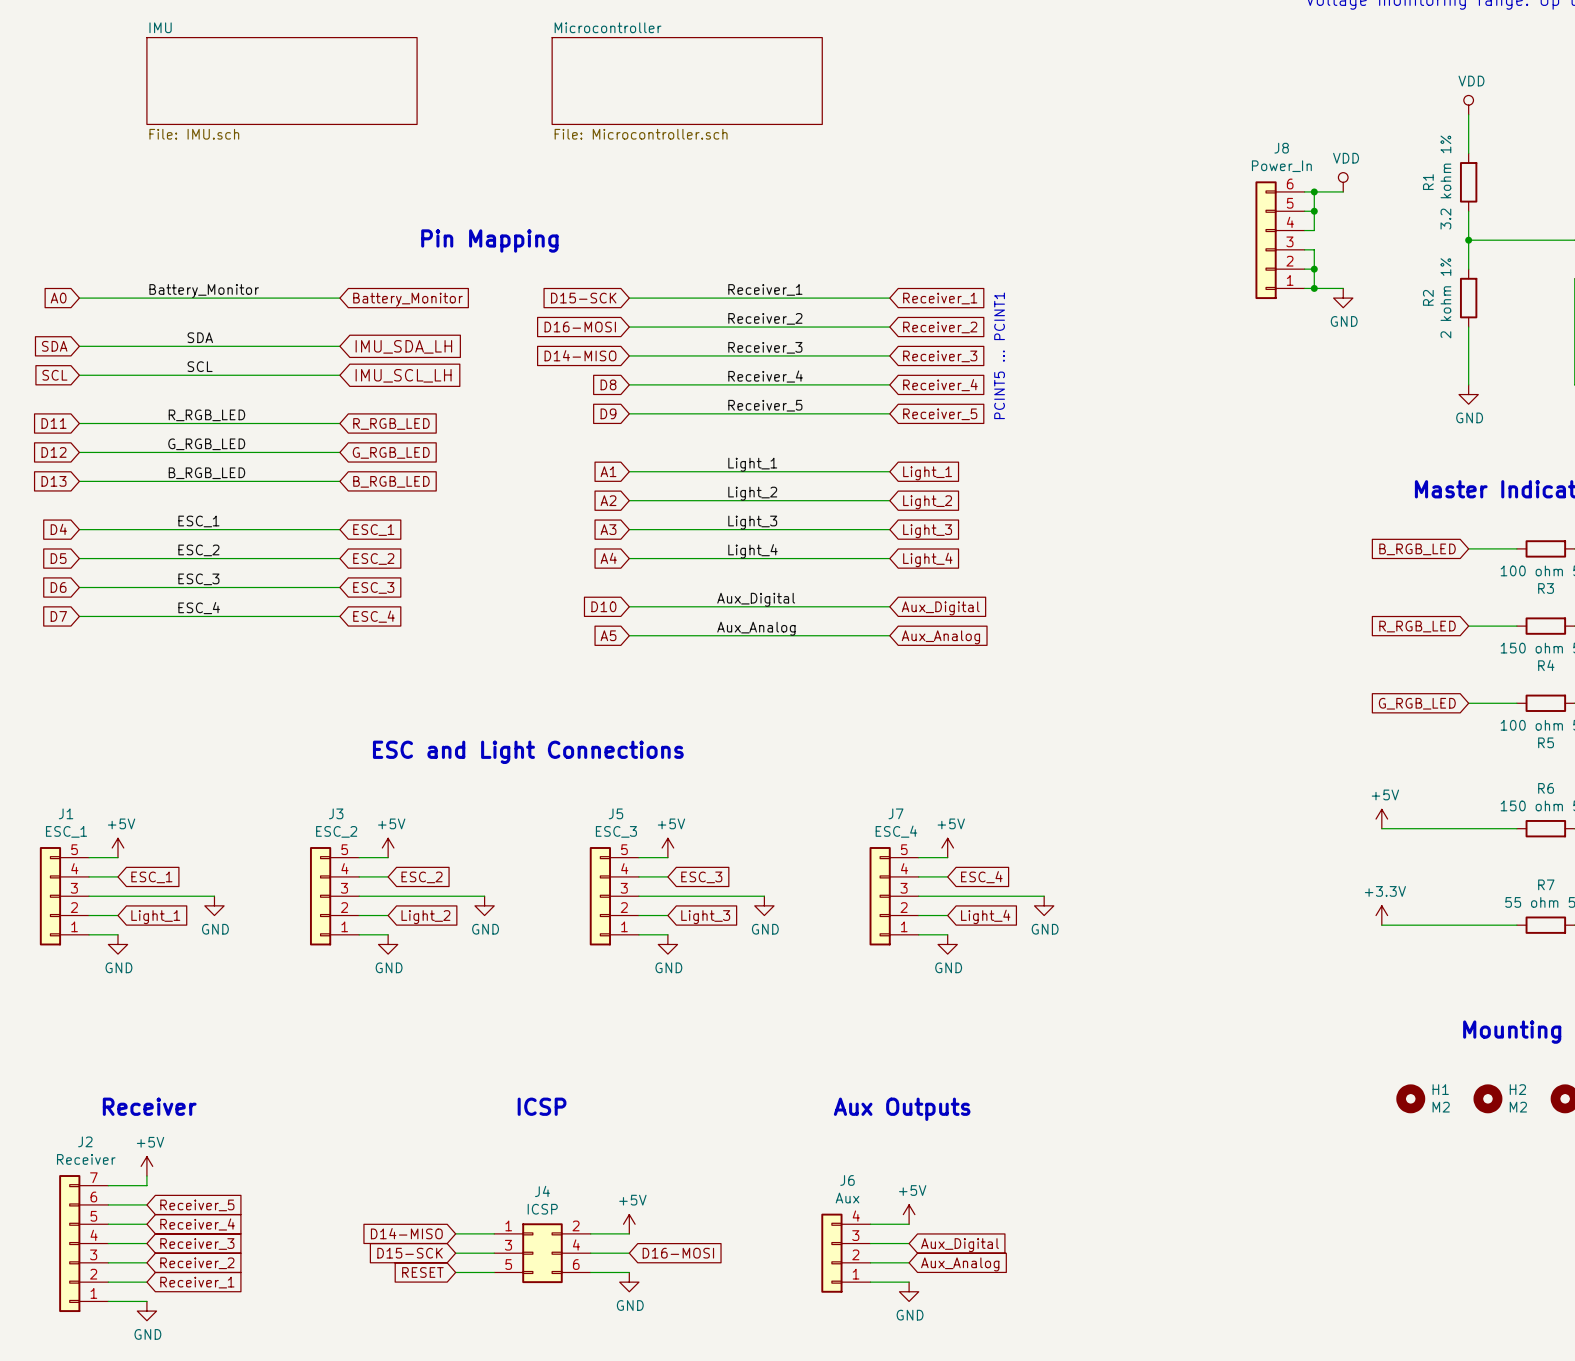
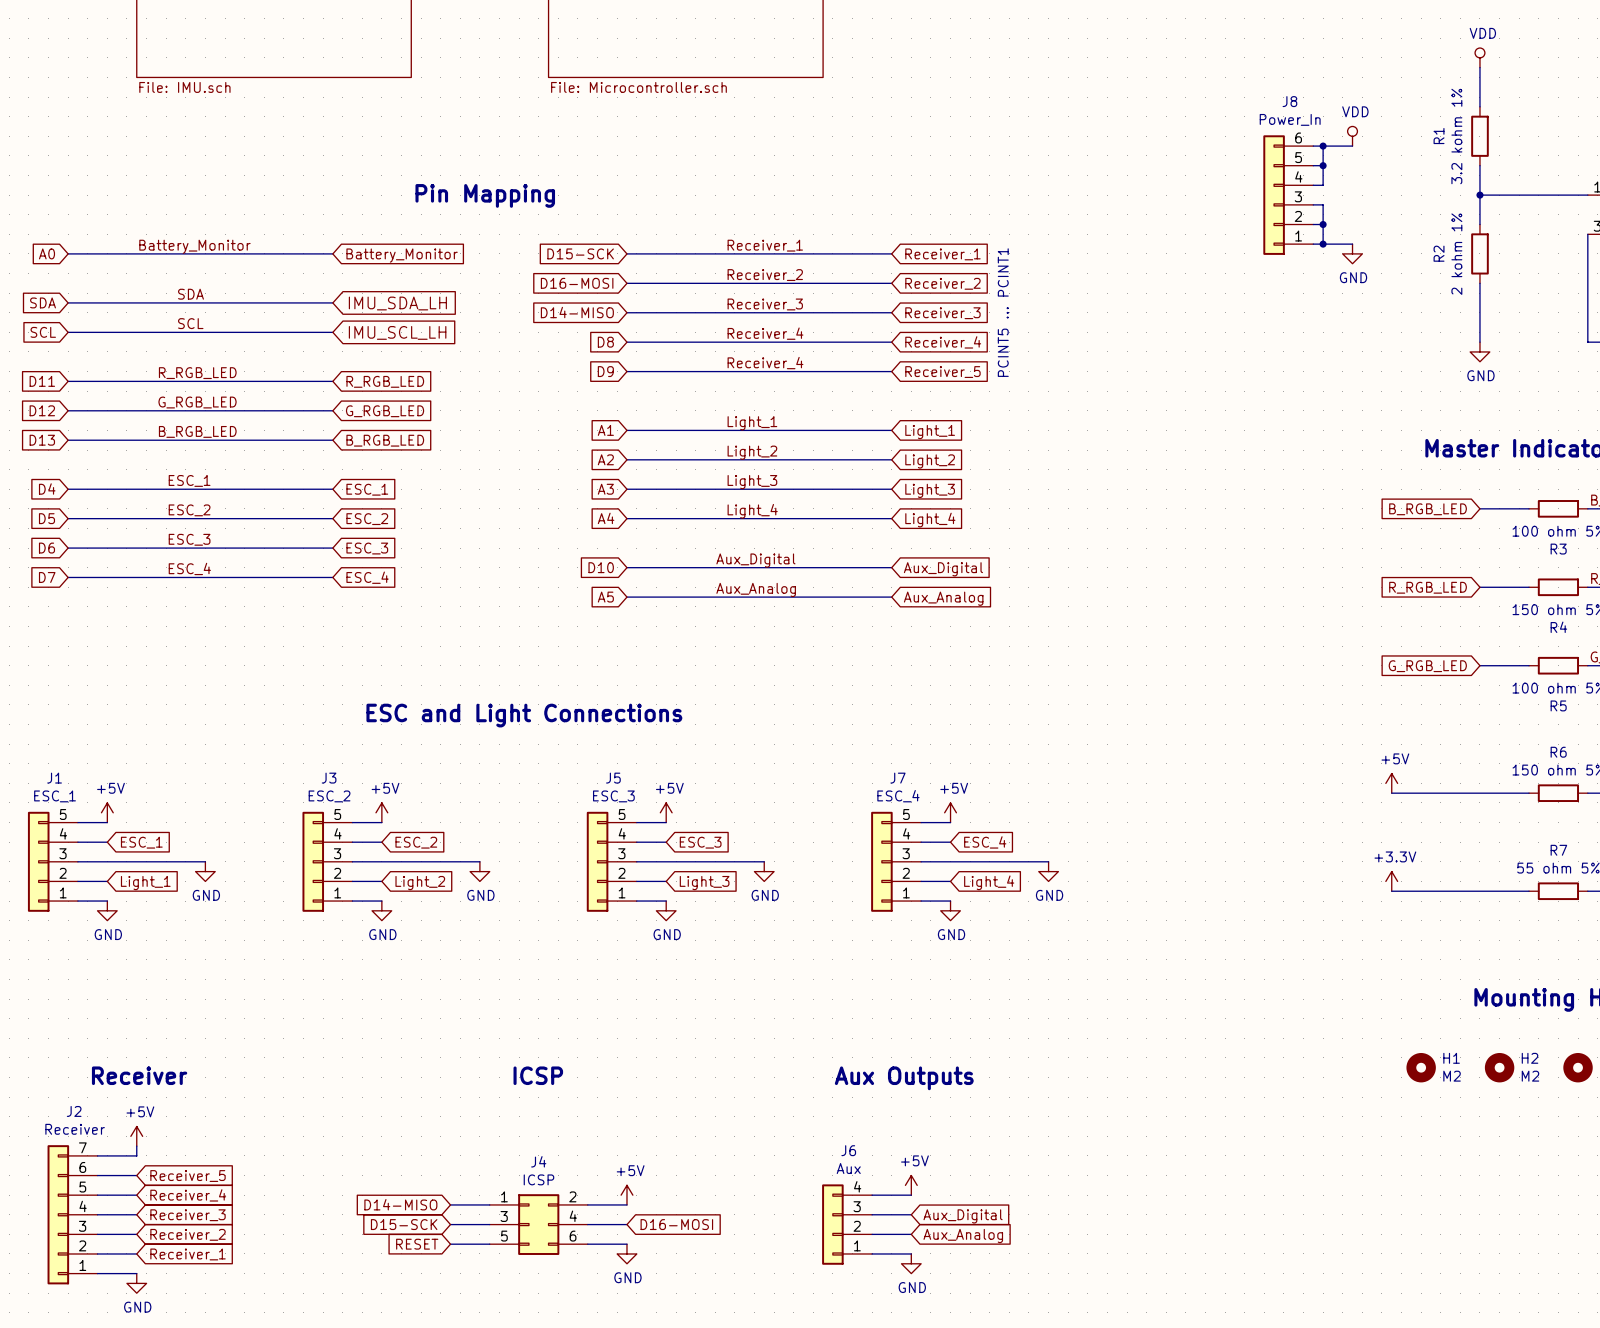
label: Receiver_5 (765, 405) -> Receiver_4 (765, 363)

